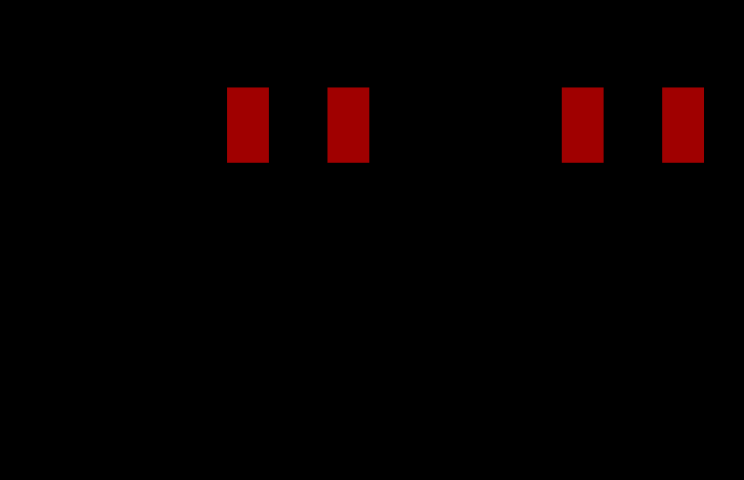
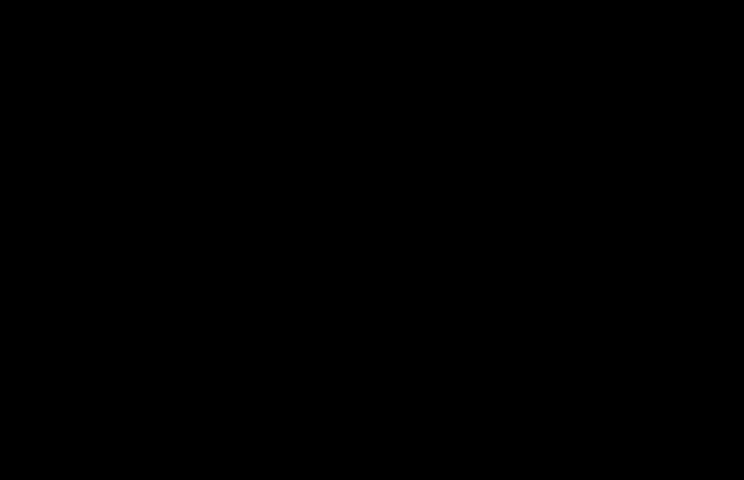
part: (298, 125) -> none
part: (632, 125) -> none

